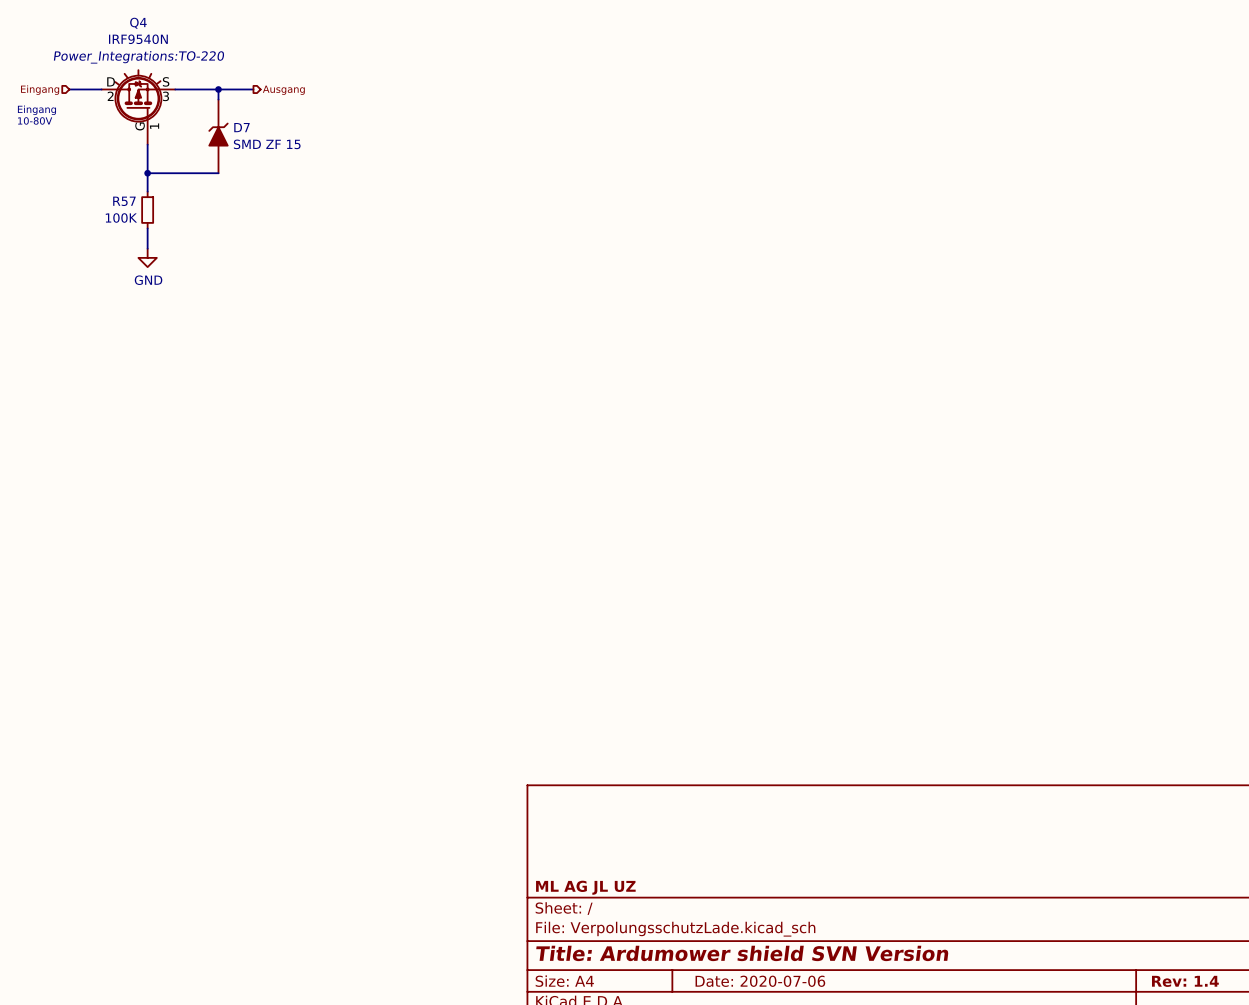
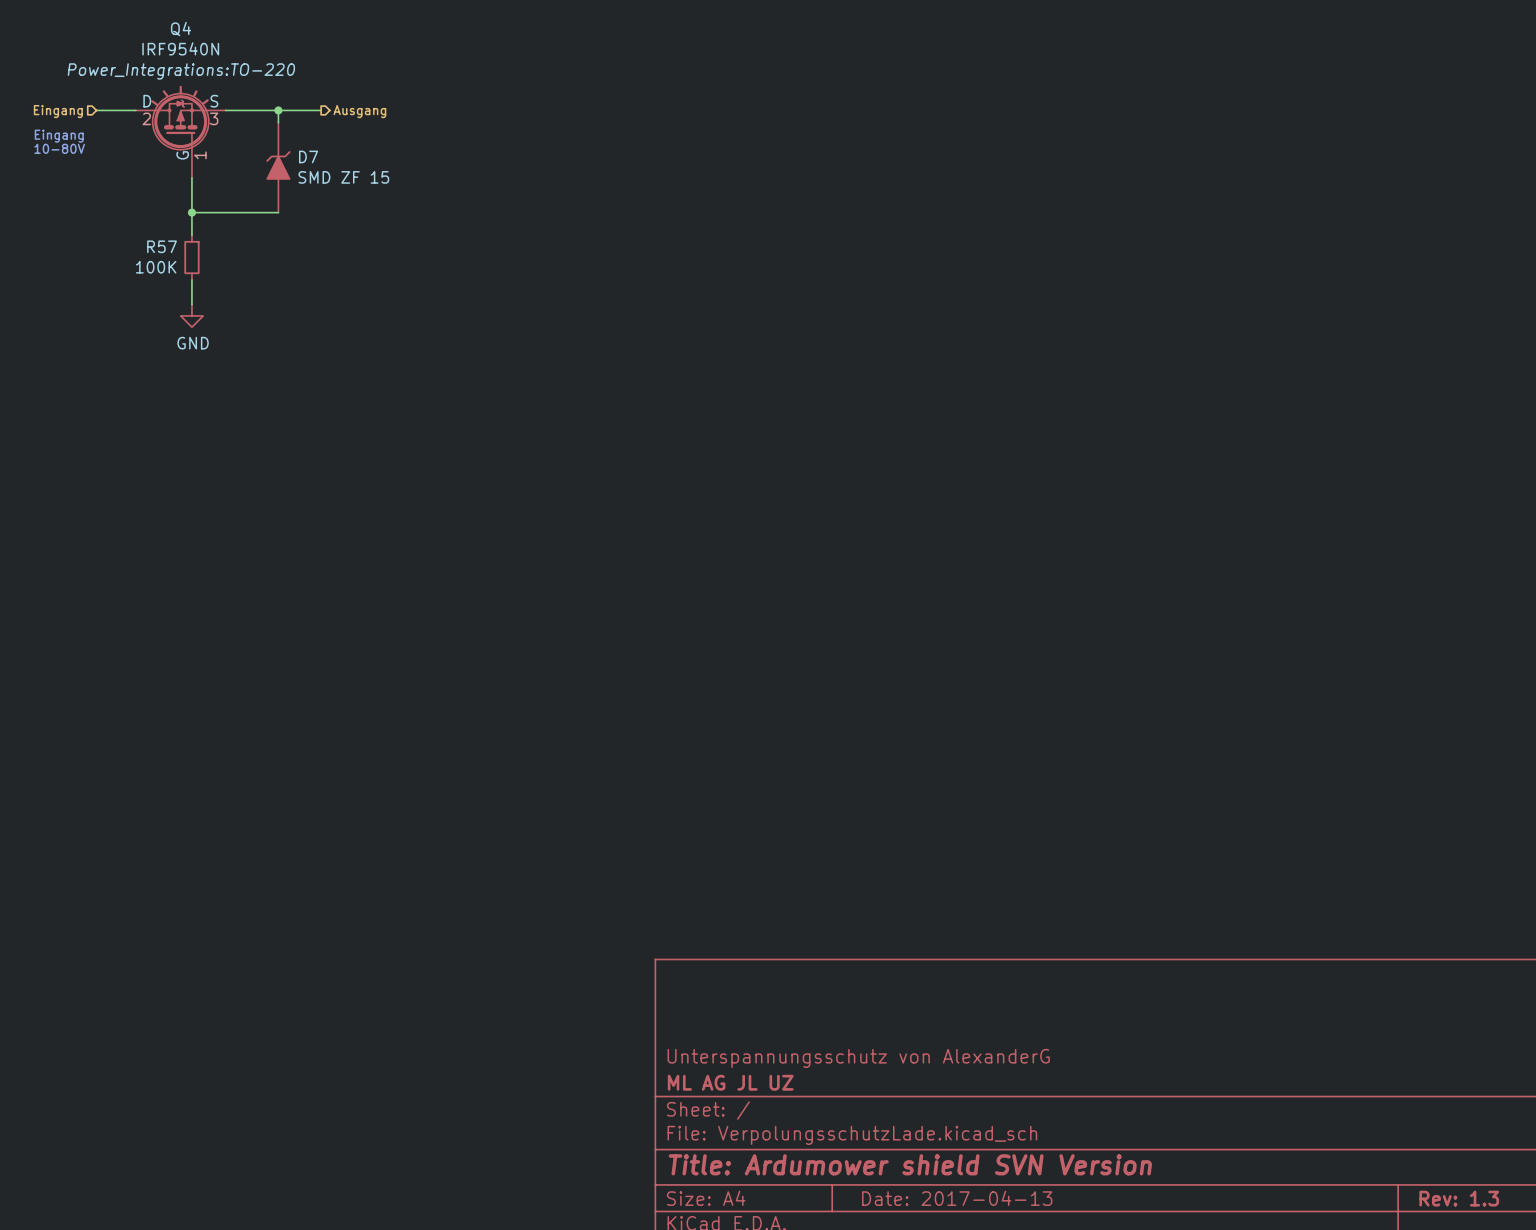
title block: none -> Unterspannungsschutz von AlexanderG (858, 1058)
title block: Date: 2020-07-06 (760, 981) -> Date: 2017-04-13 (957, 1198)
title block: Rev: 1.4 (1185, 981) -> Rev: 1.3 (1459, 1198)

